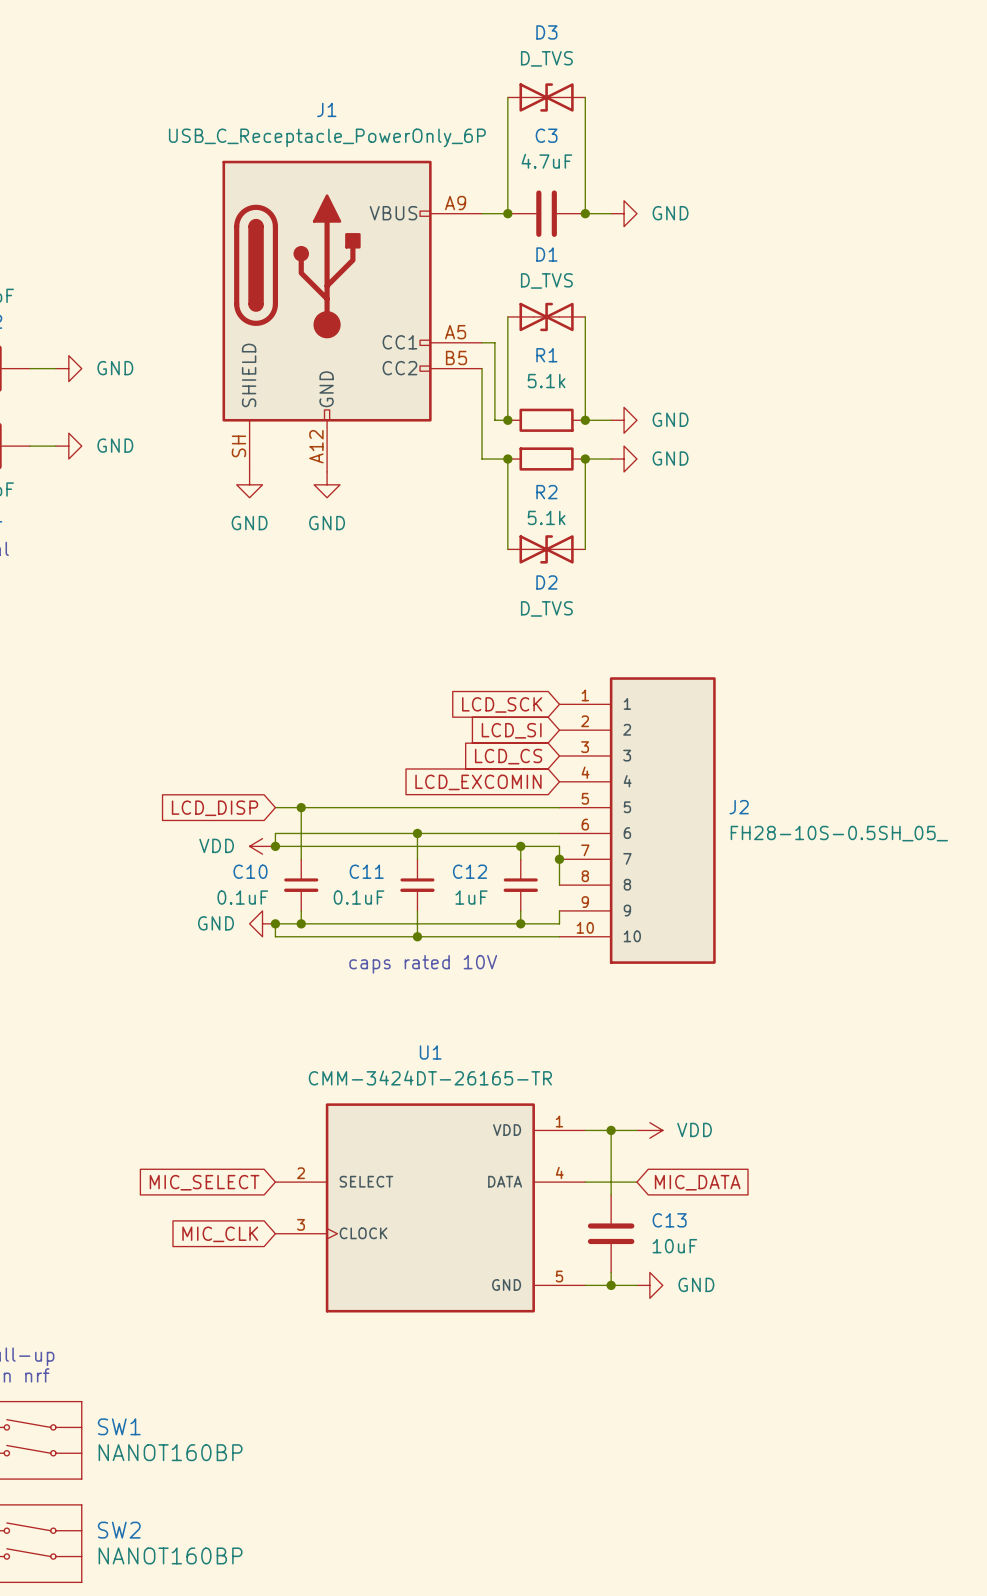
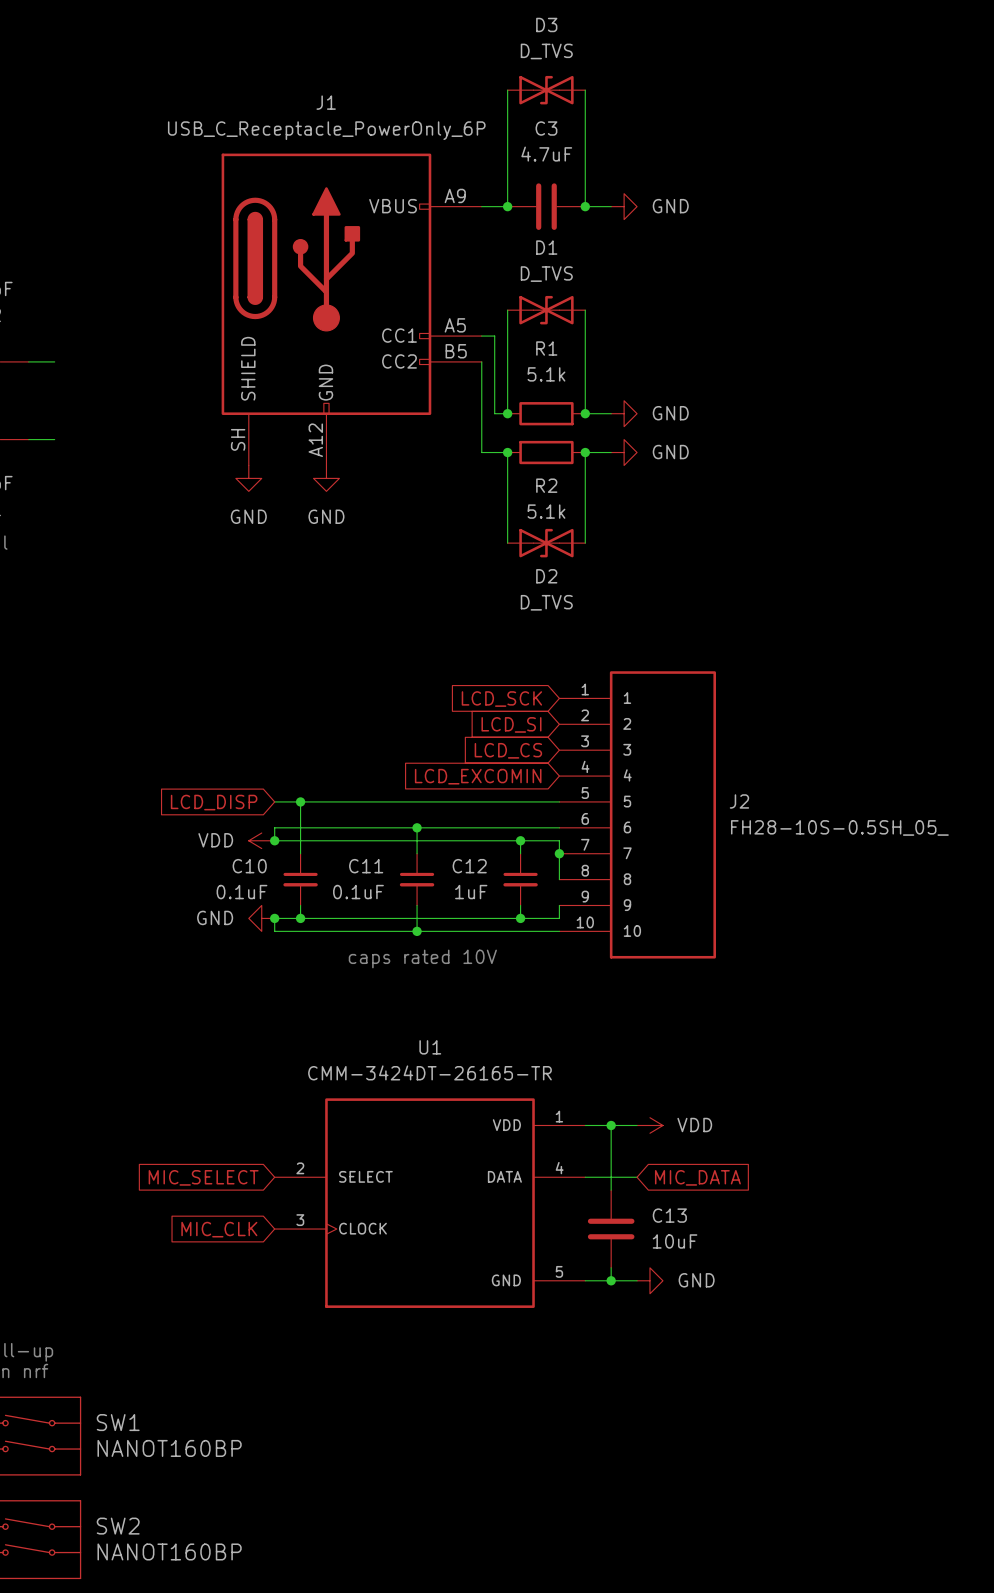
power symbol: GND (68, 368) -> none
power symbol: GND (68, 446) -> none

